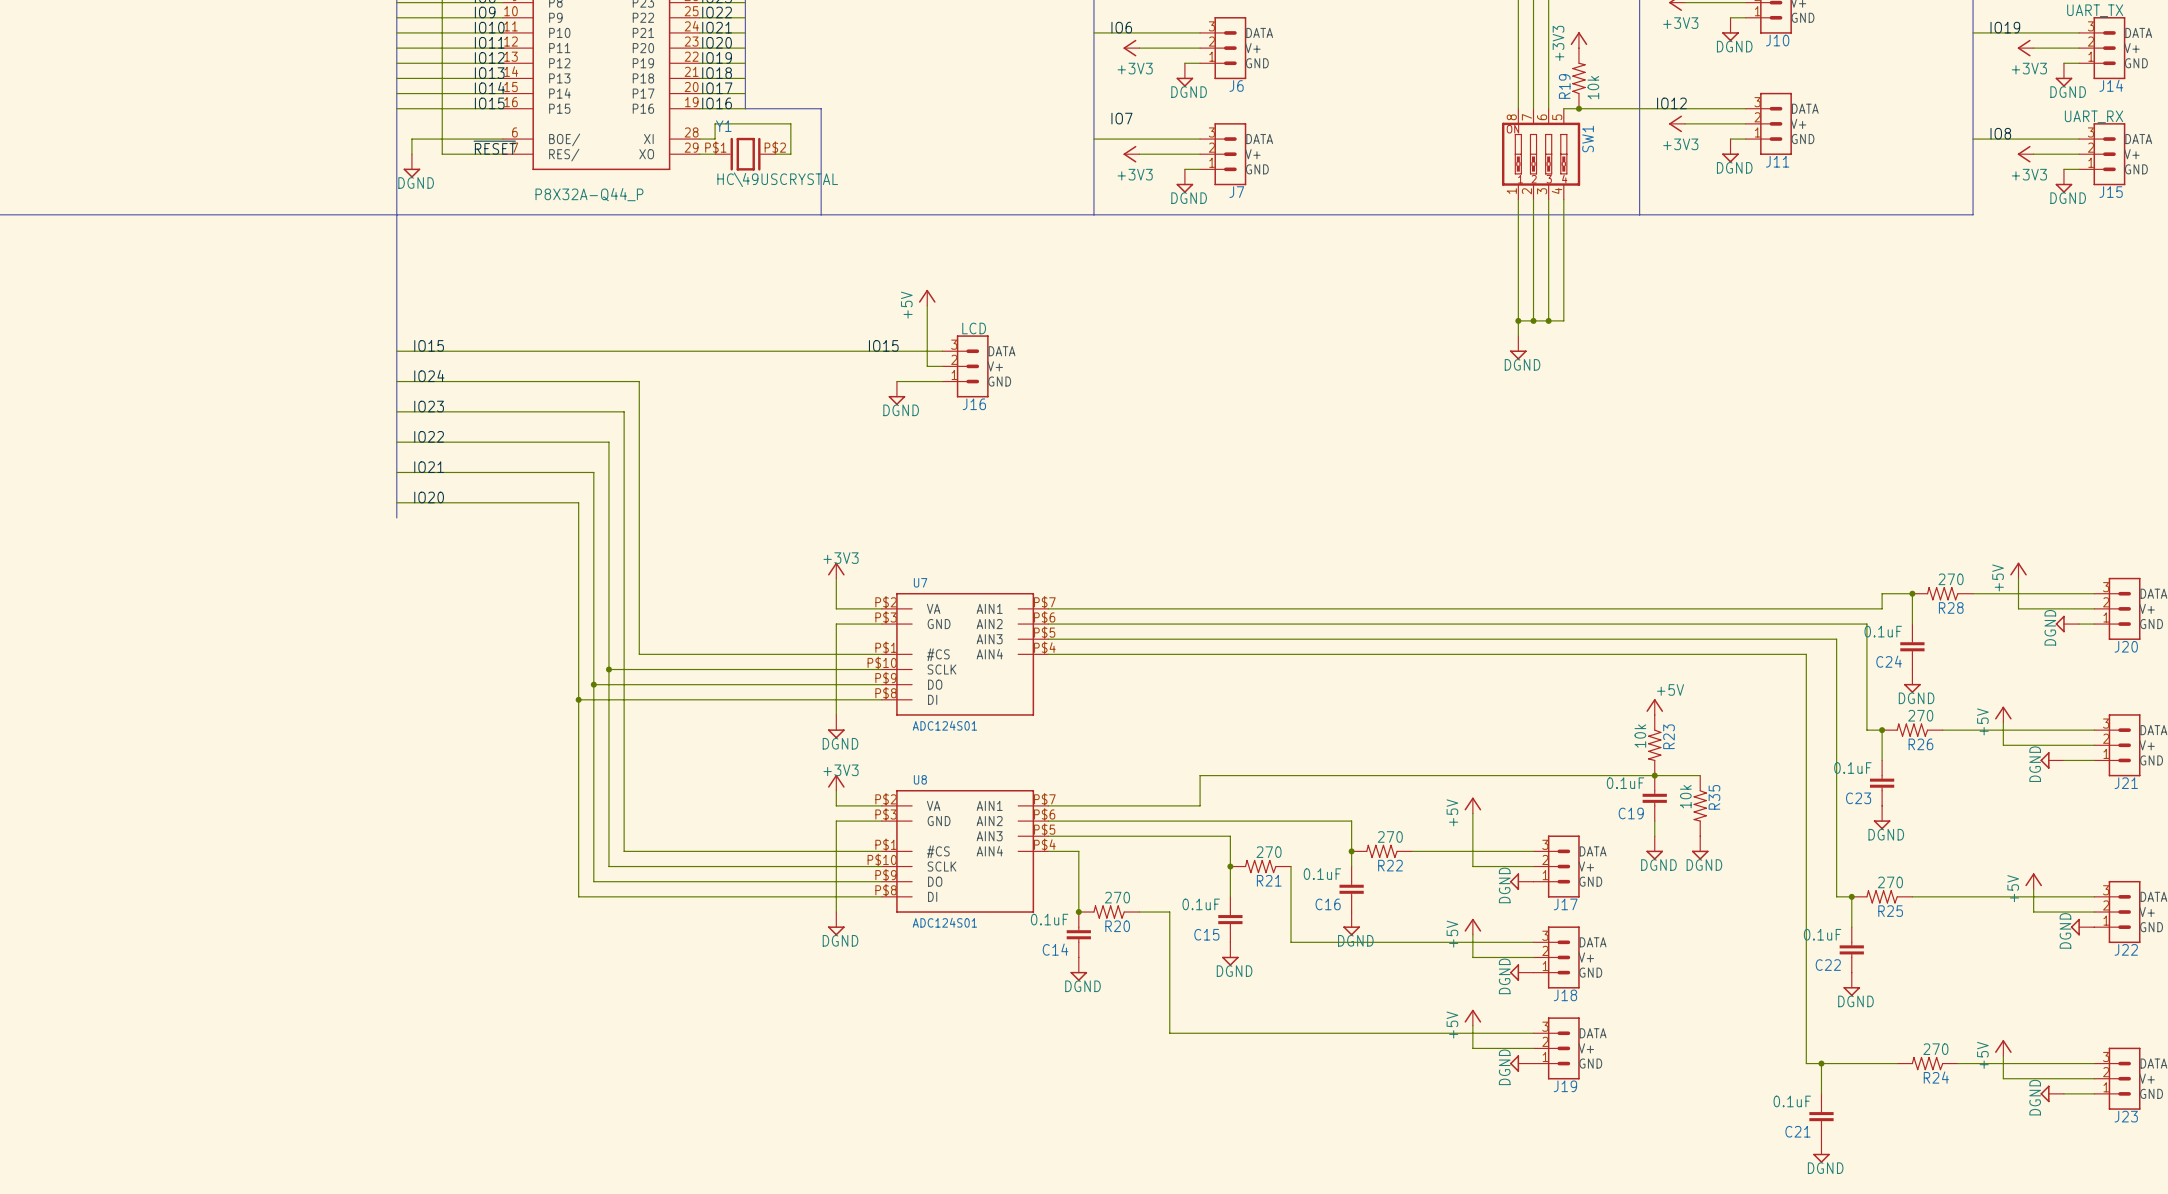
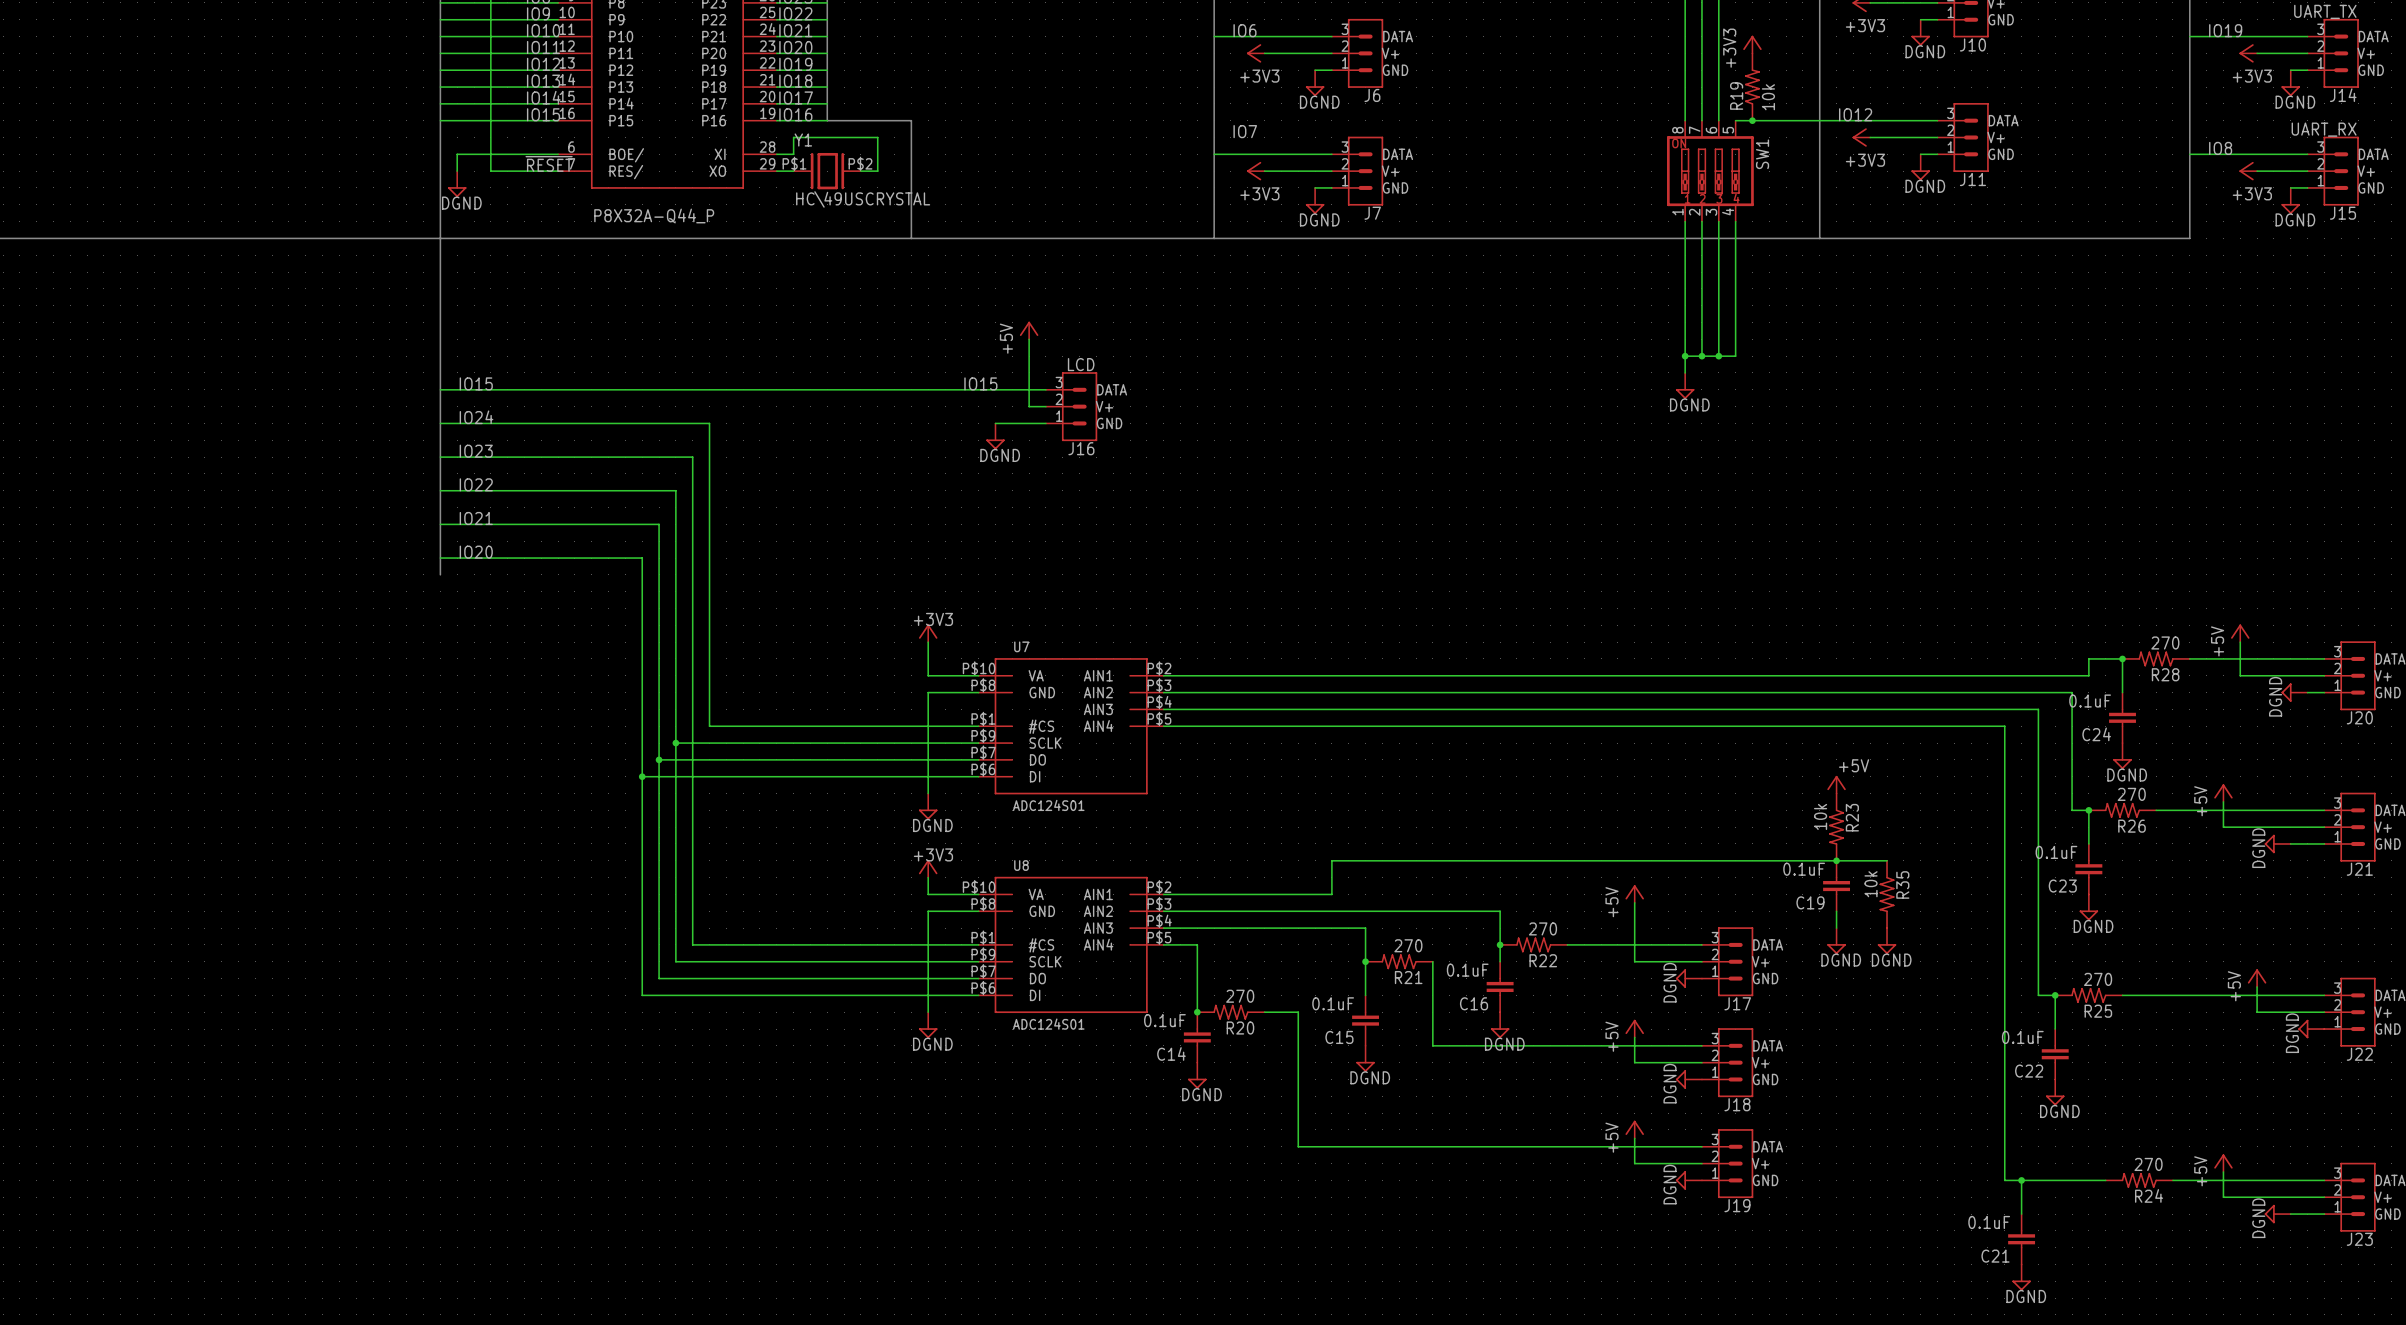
U7 symbol: [881, 592, 1049, 716] -> [978, 658, 1164, 795]
U8 symbol: [881, 790, 1049, 913] -> [978, 876, 1164, 1014]

